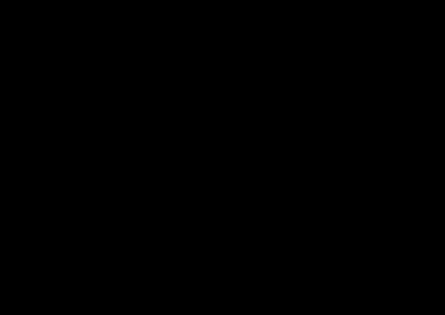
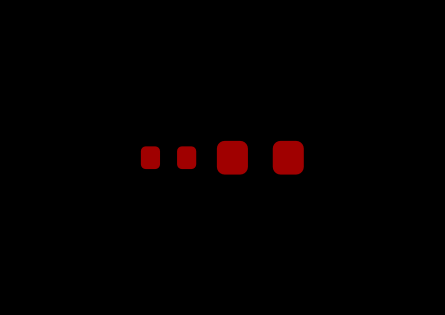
part: none -> (168, 157)
part: none -> (260, 157)

